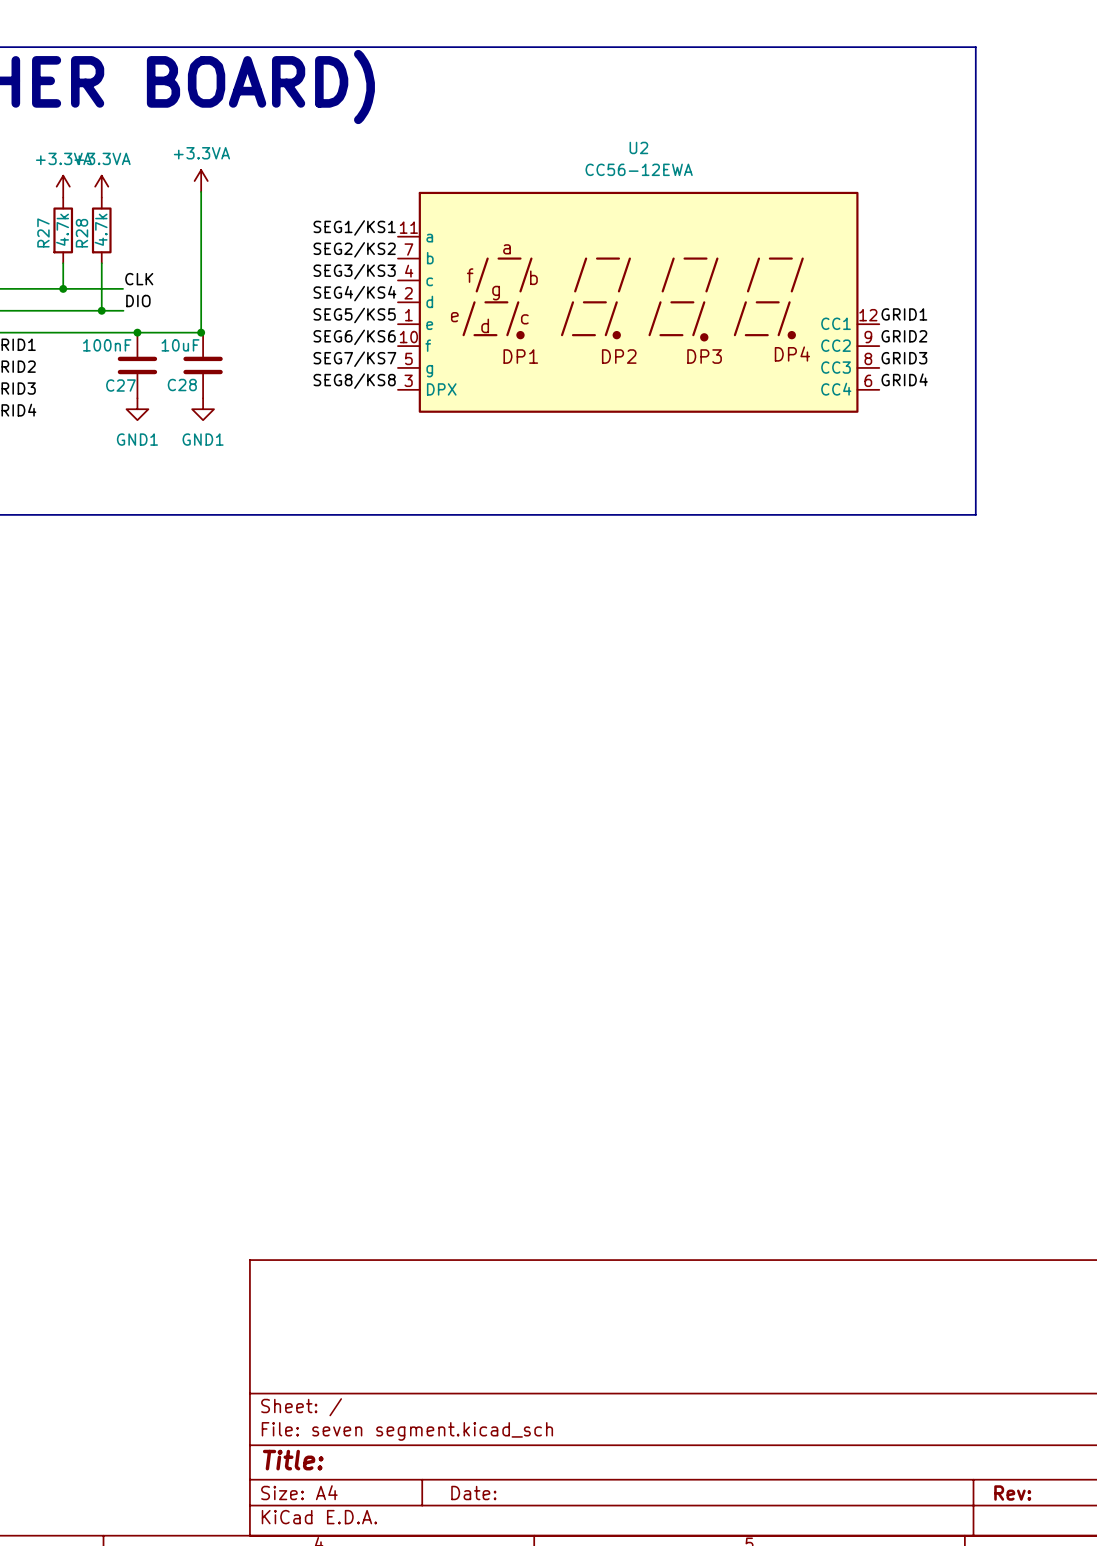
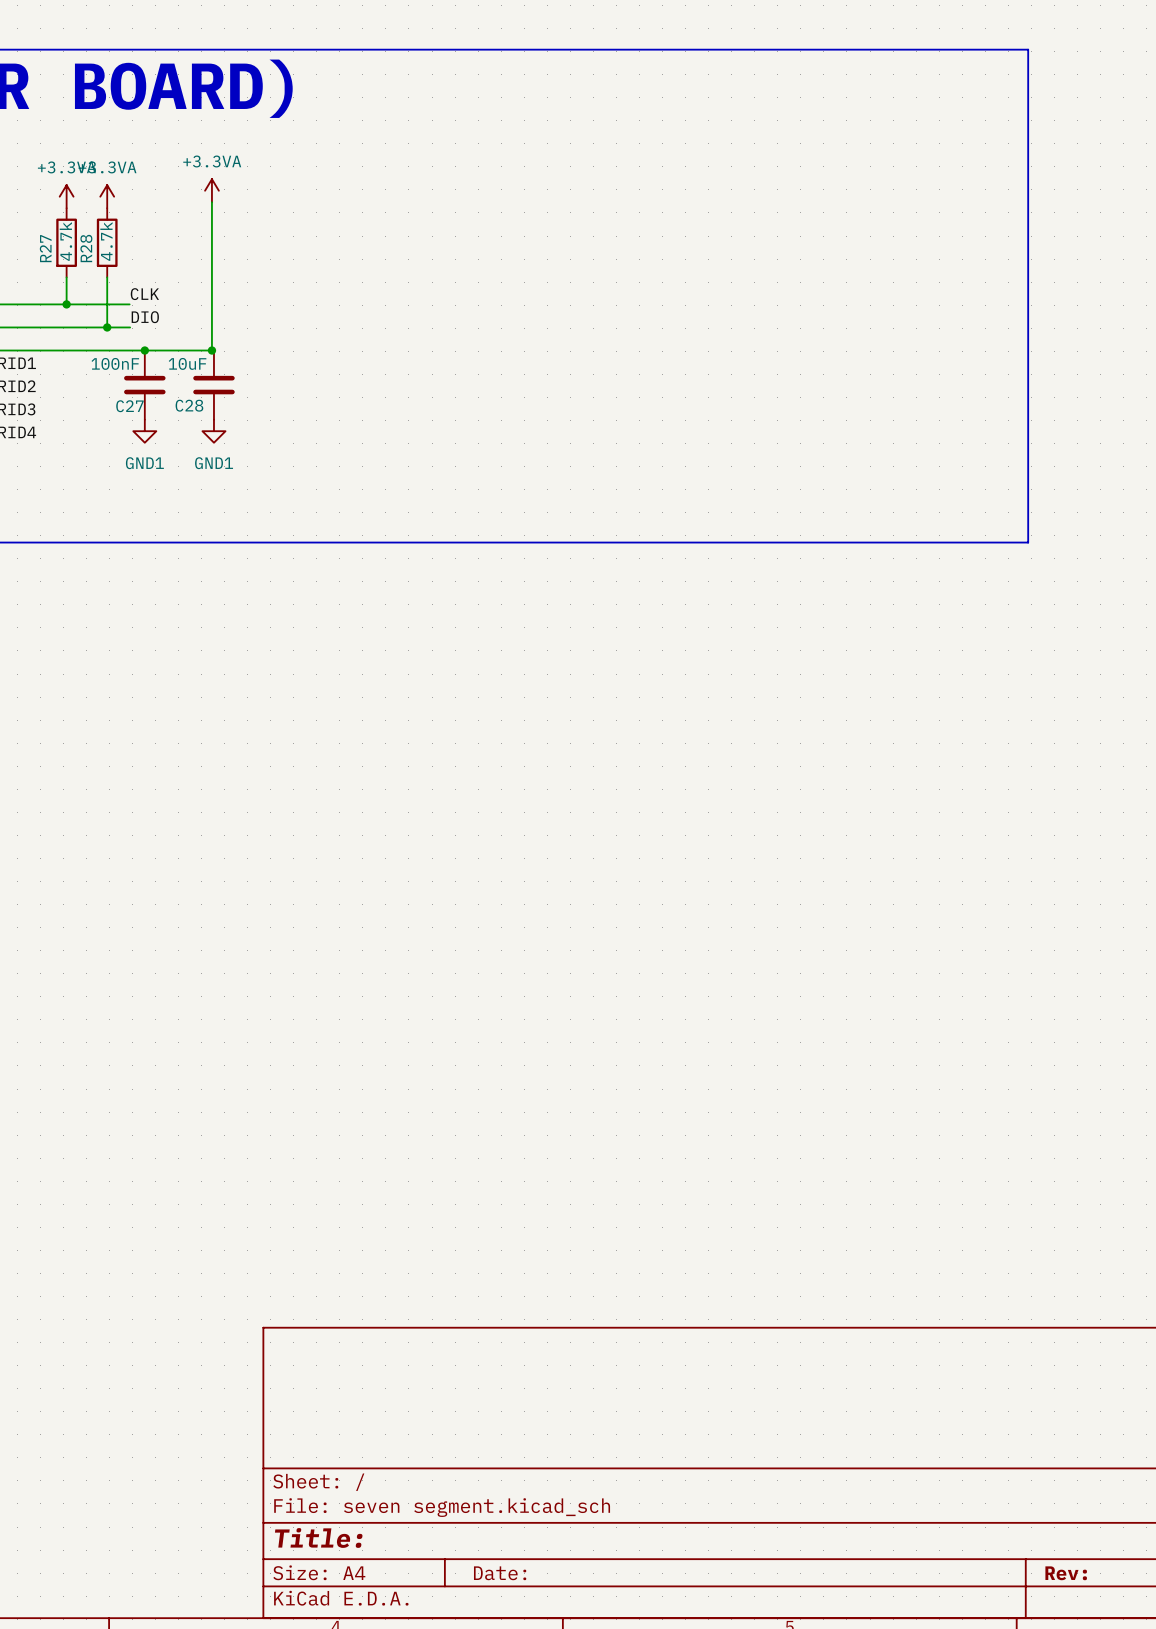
label: SEG1/KS1 (354, 227) -> none
label: SEG2/KS2 (354, 249) -> none
label: SEG3/KS3 (354, 271) -> none
label: SEG4/KS4 (354, 293) -> none
U2: CC56-12EWA (638, 302) -> none
label: GRID1 (904, 314) -> none
label: SEG5/KS5 (354, 315) -> none
label: GRID2 (904, 336) -> none
label: SEG6/KS6 (354, 337) -> none
label: GRID3 (904, 358) -> none
label: SEG7/KS7 (354, 359) -> none
label: GRID4 (904, 379) -> none
label: SEG8/KS8 (354, 381) -> none

